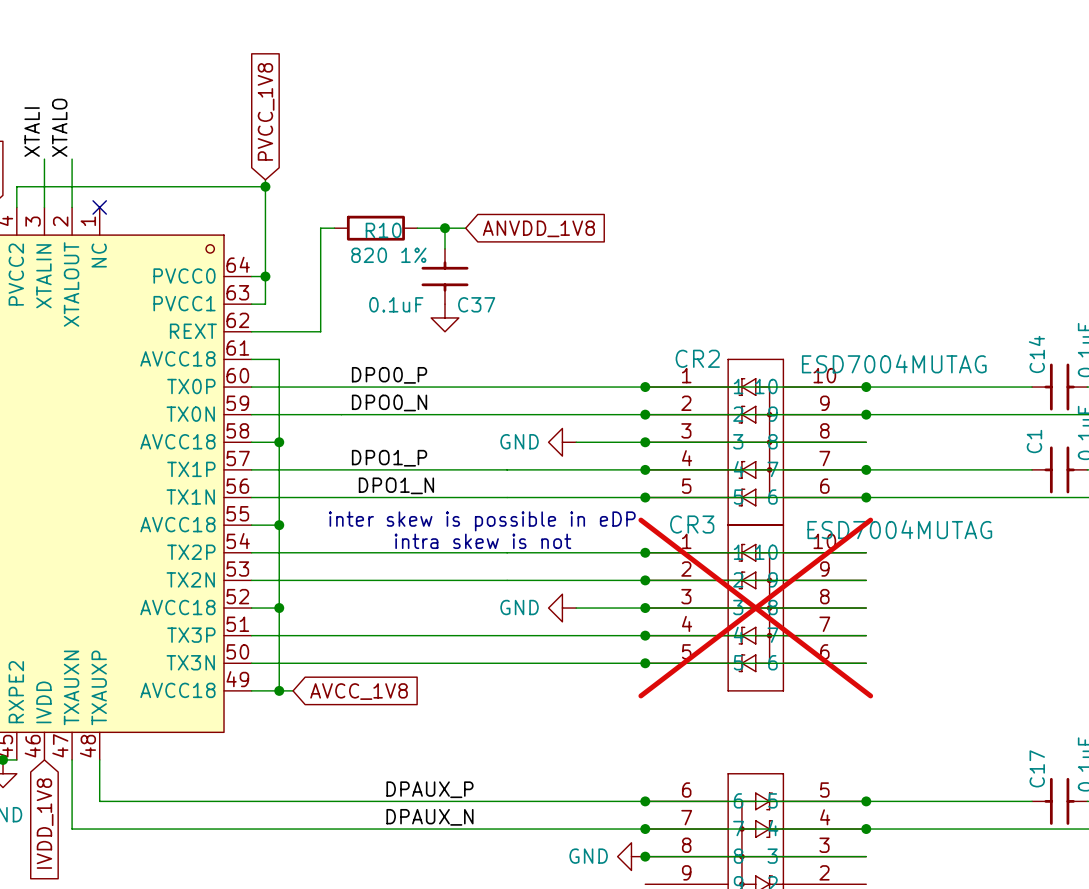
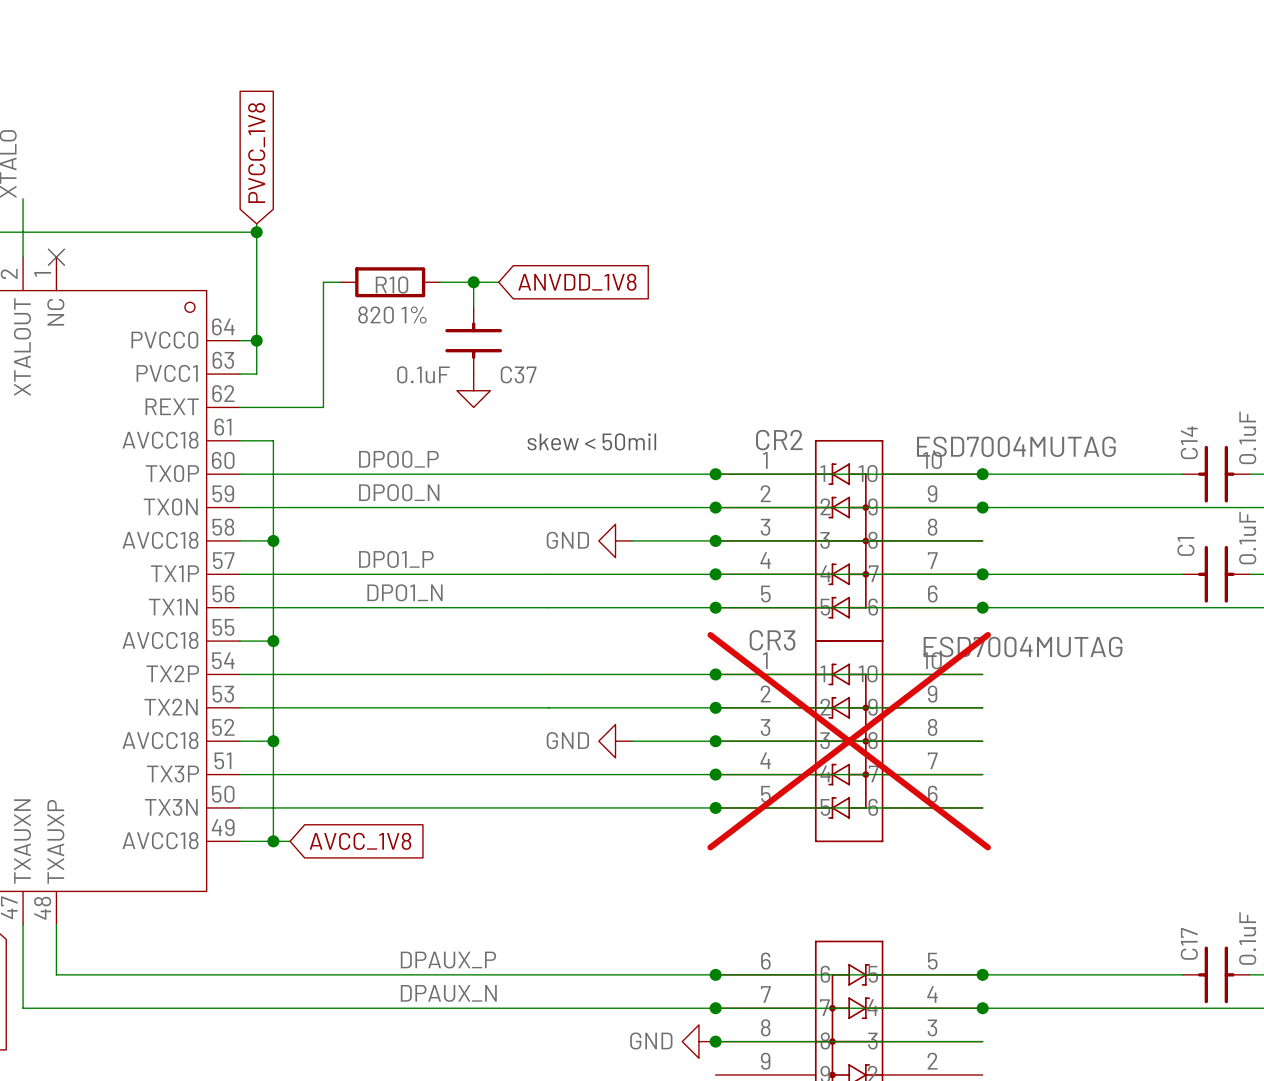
text: none -> skew < 50mil (591, 441)
text: inter skew is possible in eDP (482, 521) -> none
text: intra skew is not (482, 541) -> none

